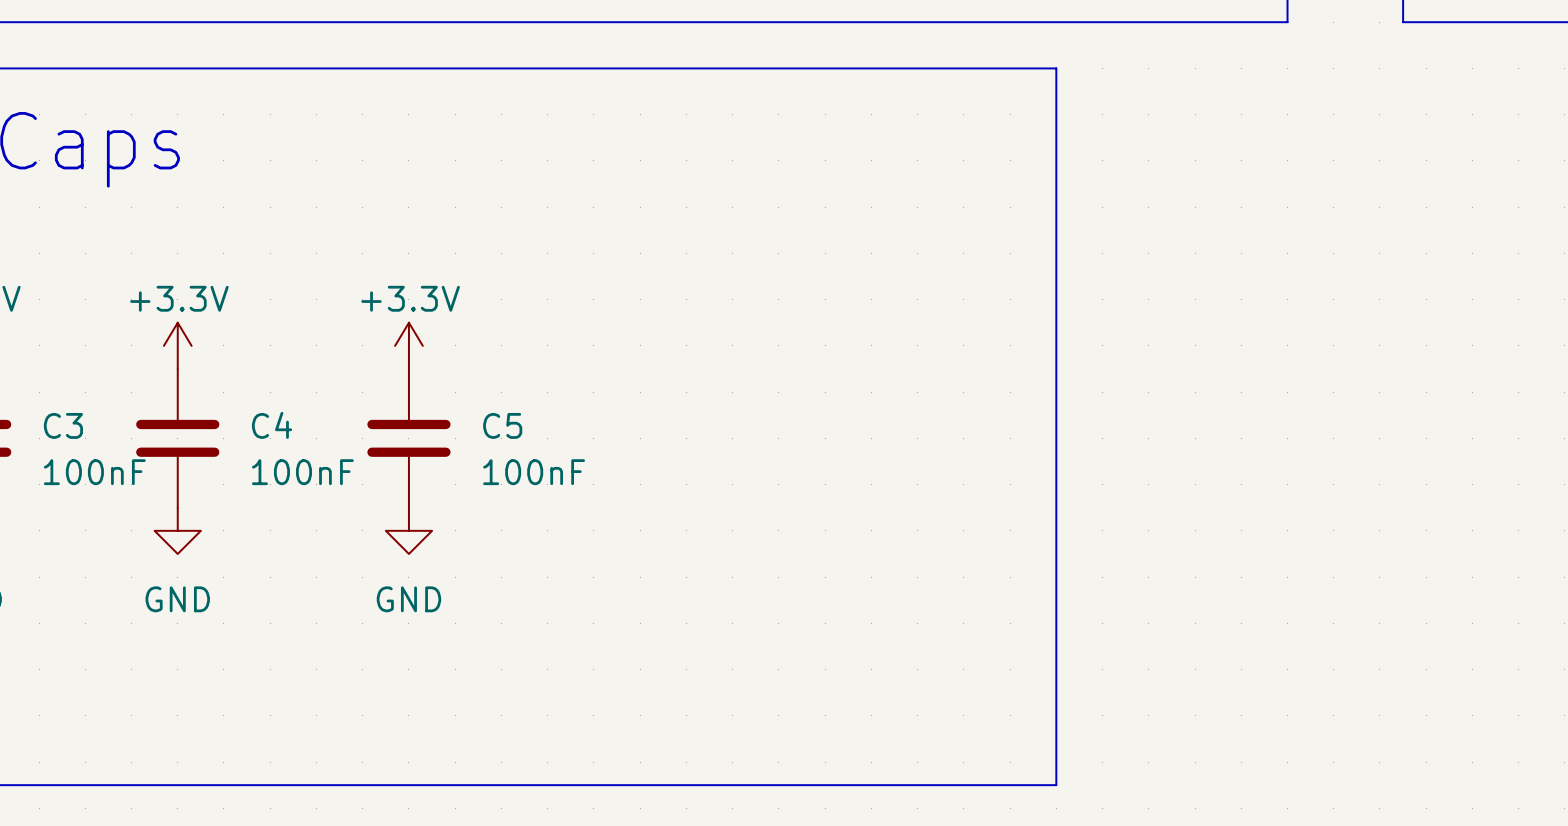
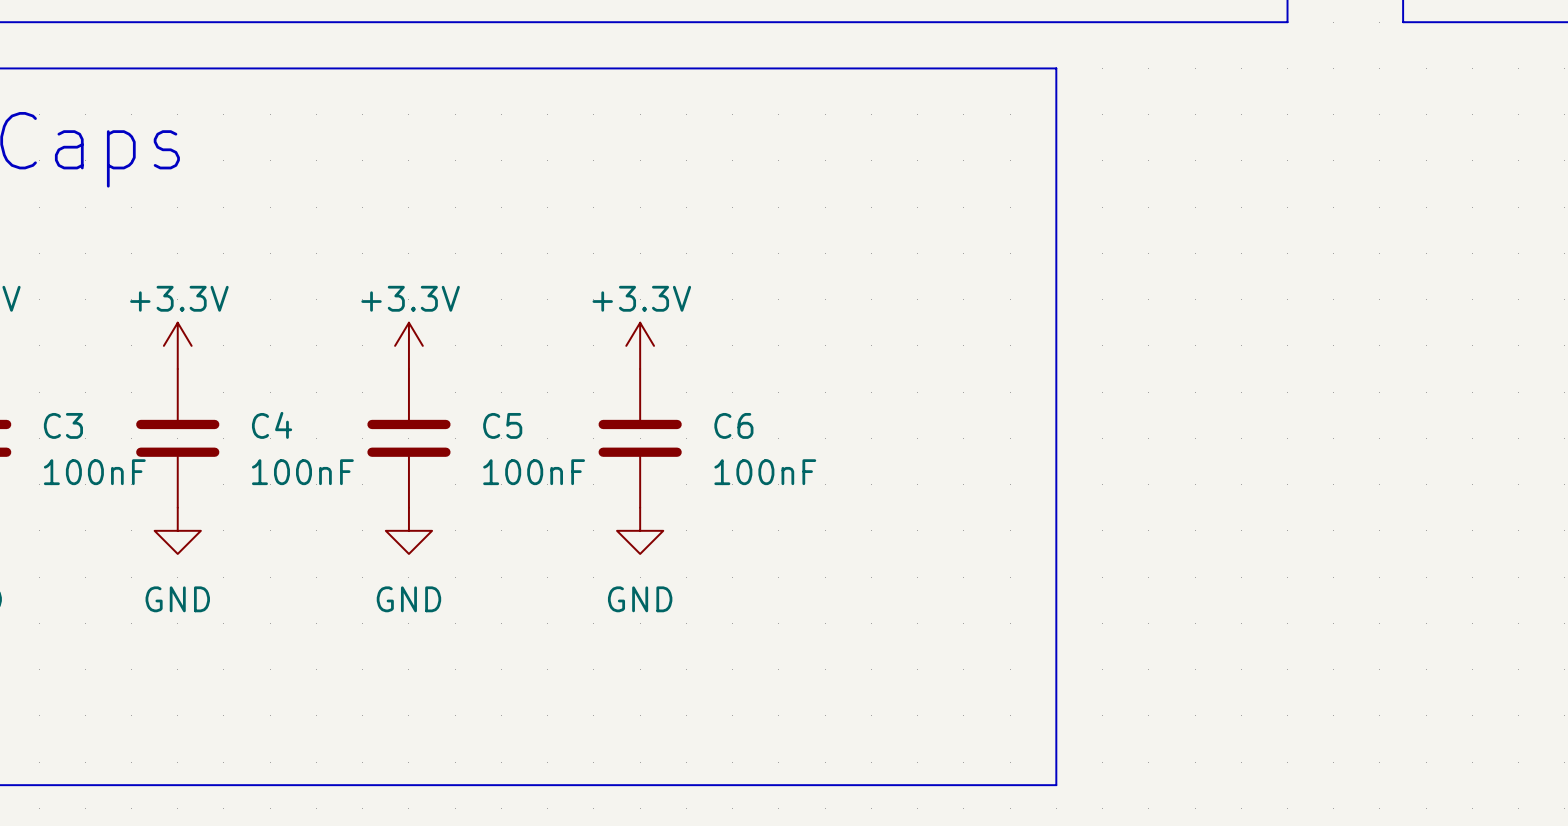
power symbol: none -> +3.3V (640, 345)
C6: none -> 100nF (640, 438)
power symbol: none -> GND (640, 530)

